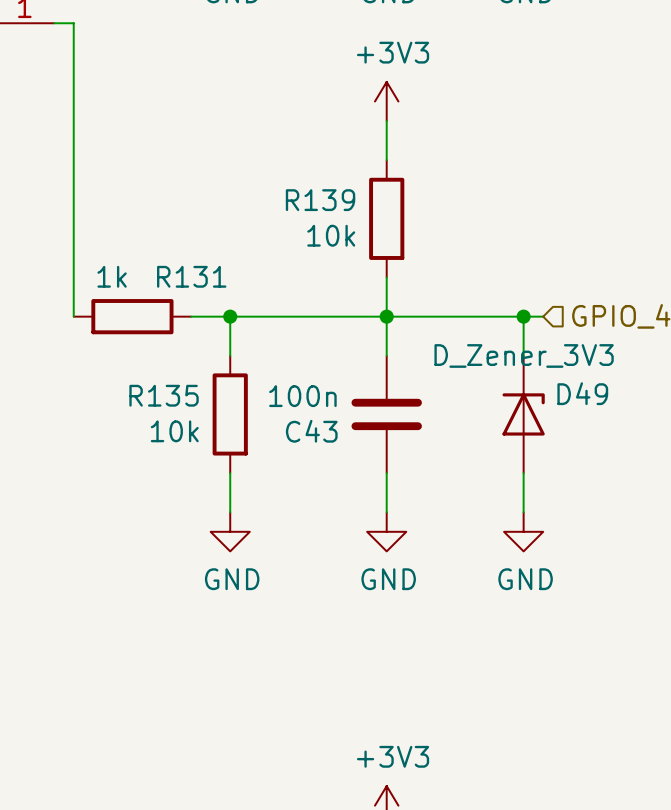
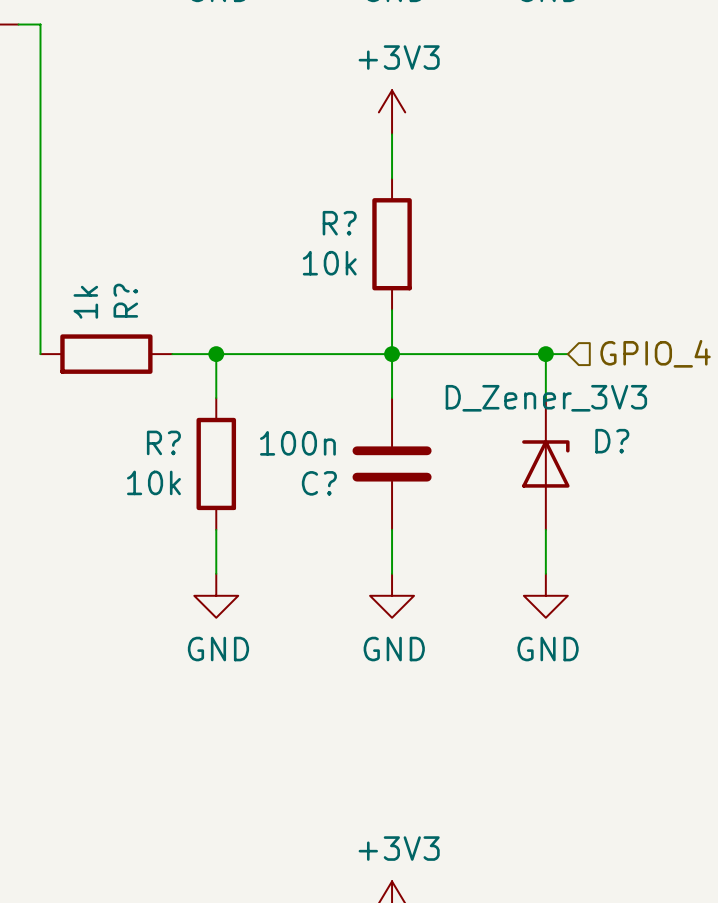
R139 name: R139 (320, 200) -> R? (339, 223)
R131 value rotation: 0° (112, 276) -> 90° counterclockwise (85, 302)
R131 name: R131 (191, 276) -> R? (125, 300)
D49 name: D49 (582, 393) -> D? (612, 441)
R135 name: R135 (164, 395) -> R? (163, 442)
C43 name: C43 (311, 431) -> C? (319, 483)

